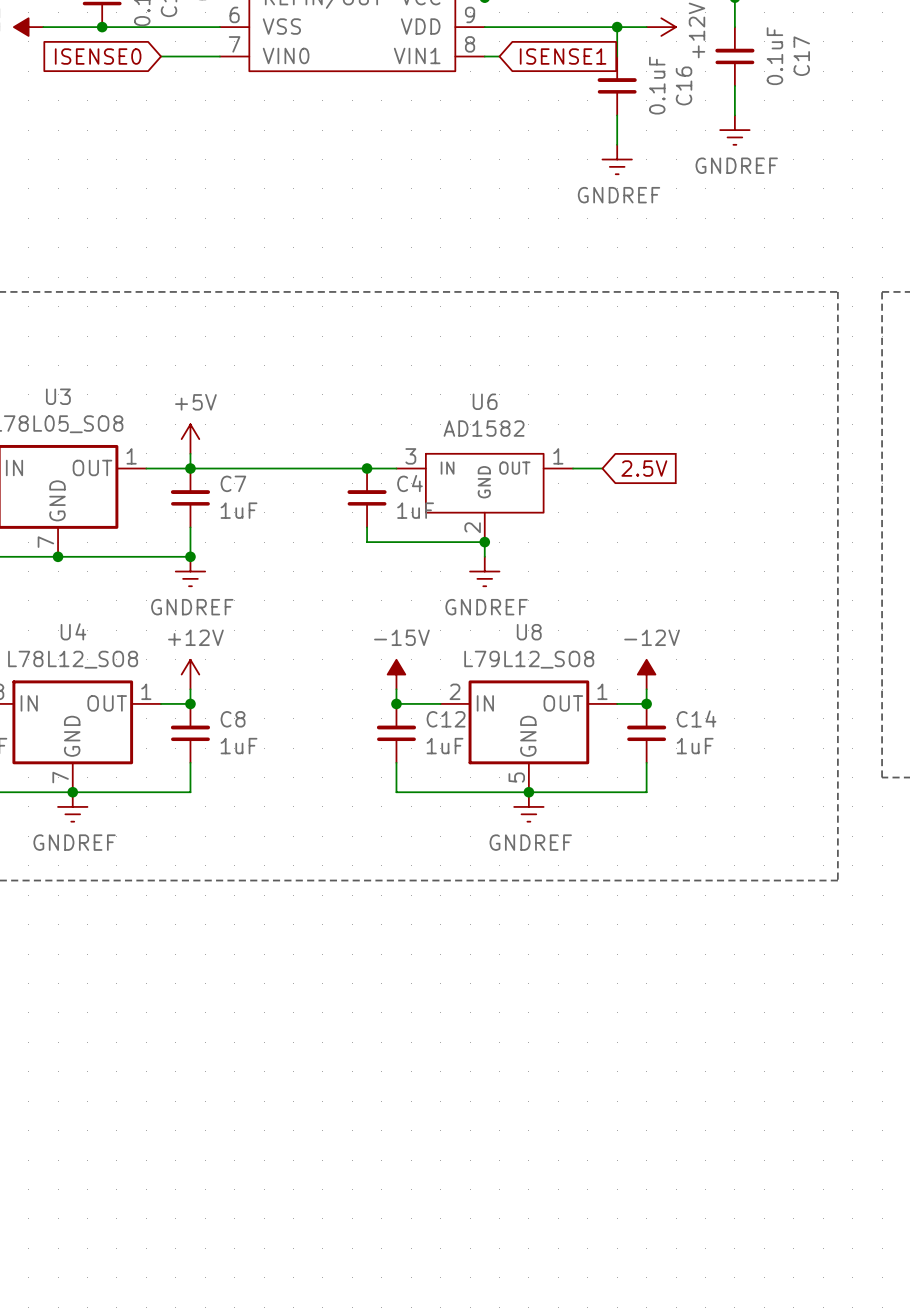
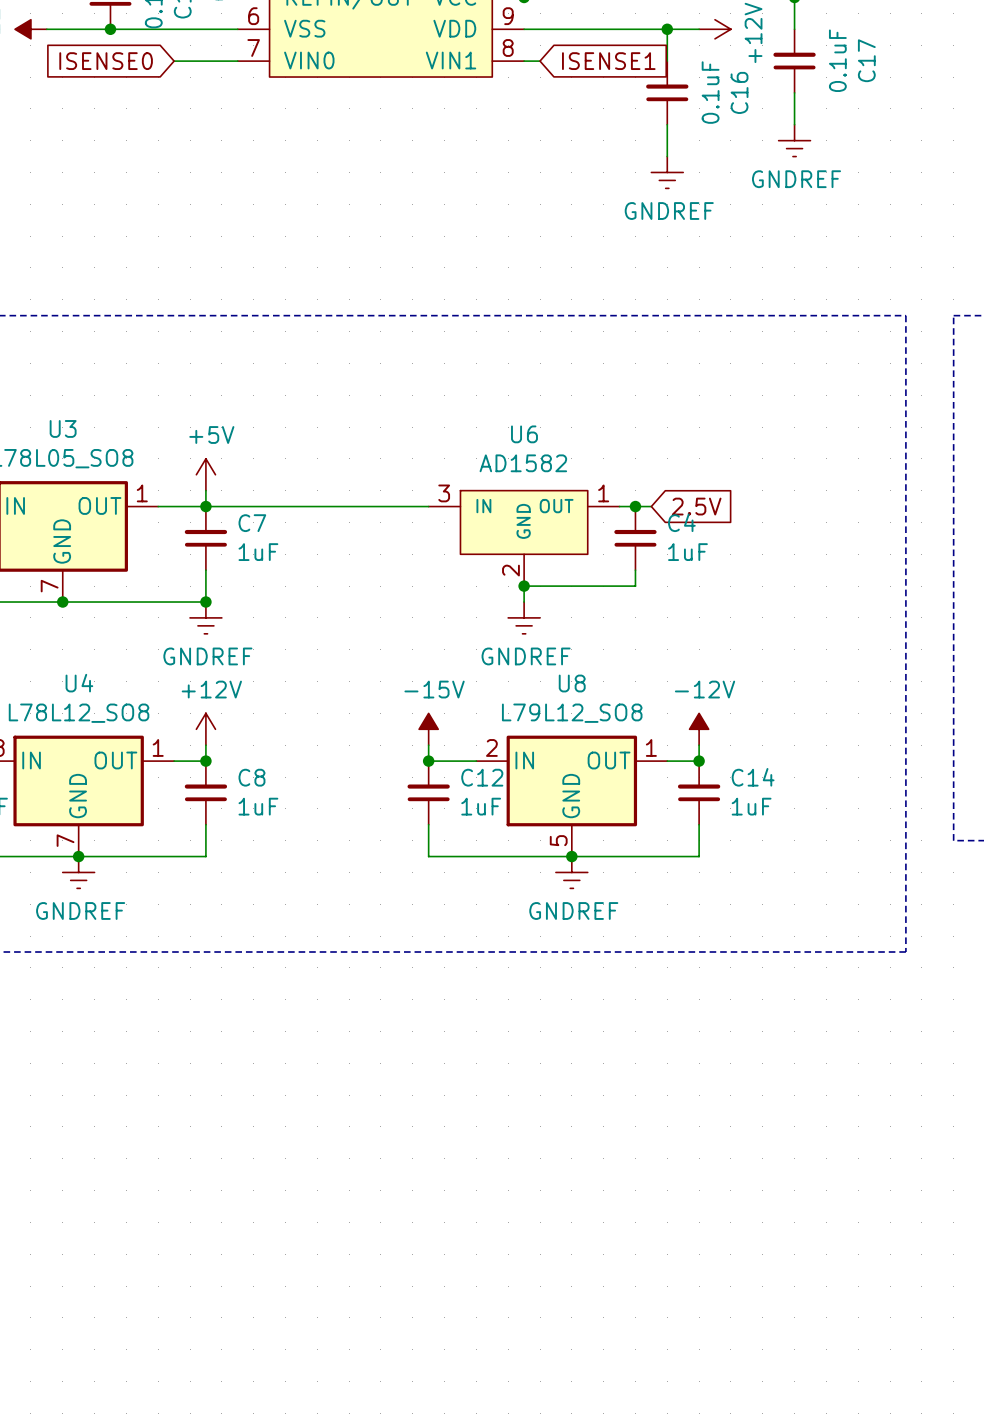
junction: (367, 468) -> none
junction: none -> (635, 506)
C4 position: (367, 497) -> (635, 538)
wire: (367, 527) (367, 542) (484, 542) -> (635, 570) (635, 586) (524, 586)

